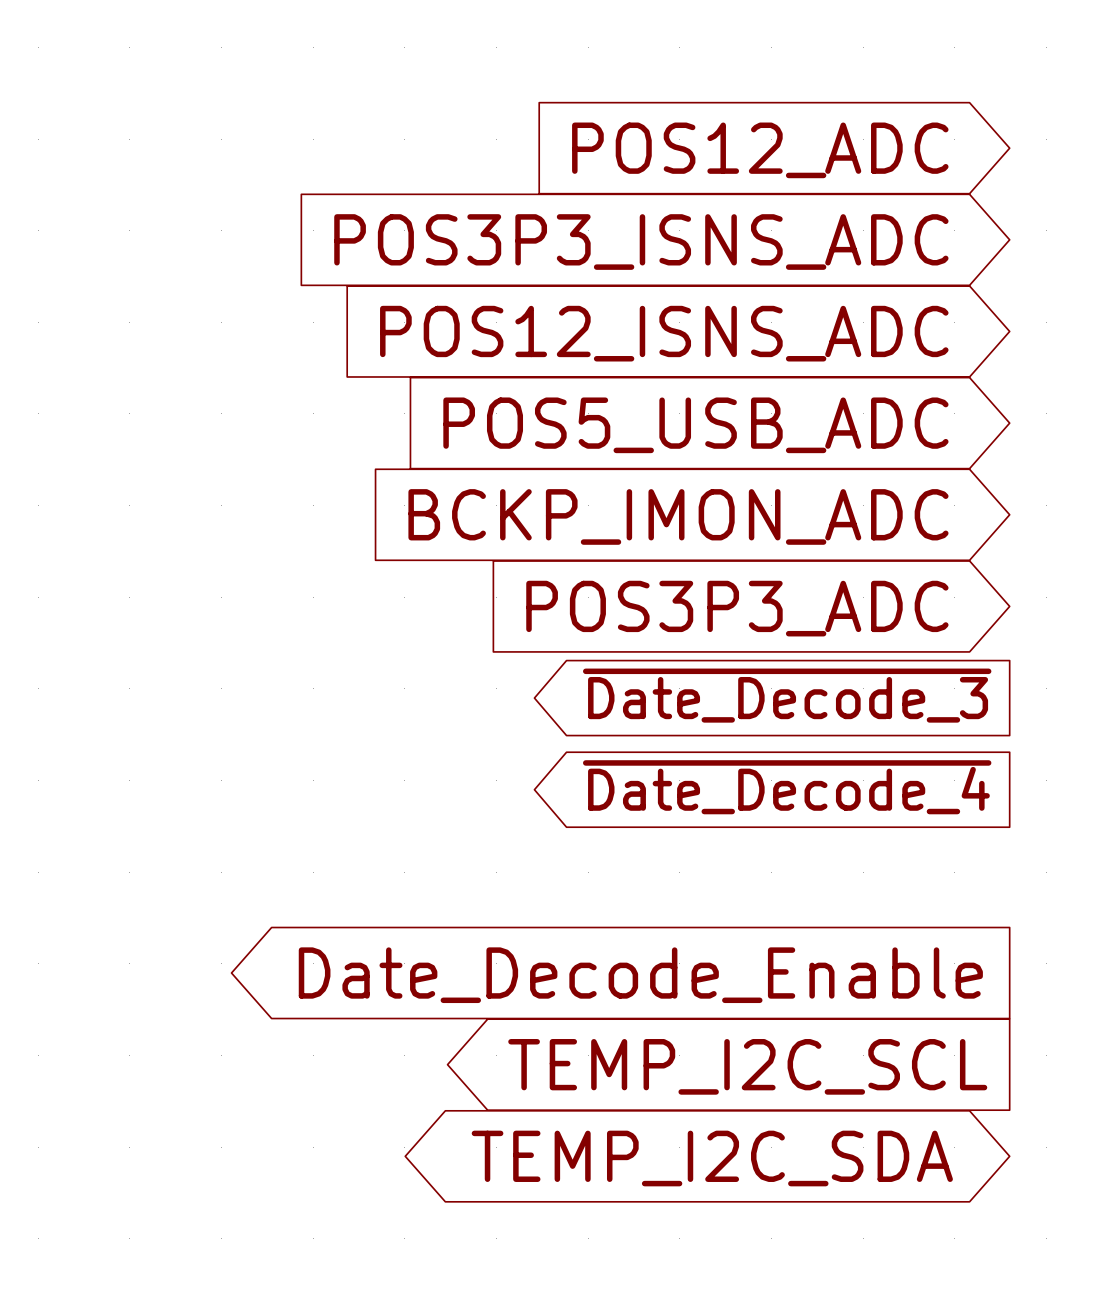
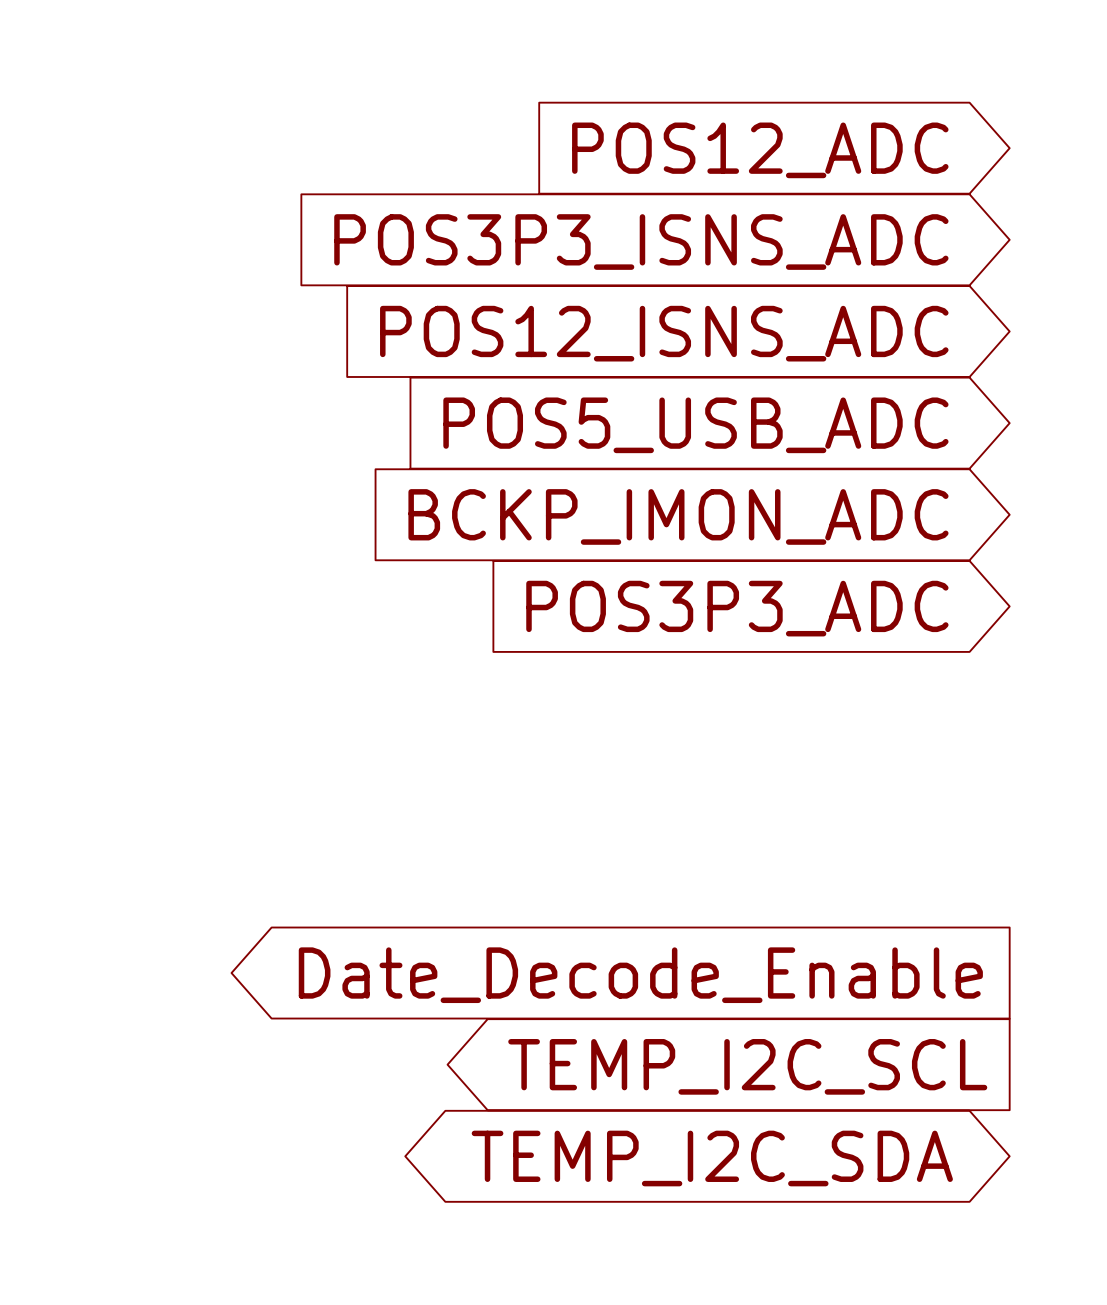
global label: ~{Date_Decode_3} (787, 695) -> none
global label: ~{Date_Decode_4} (787, 787) -> none

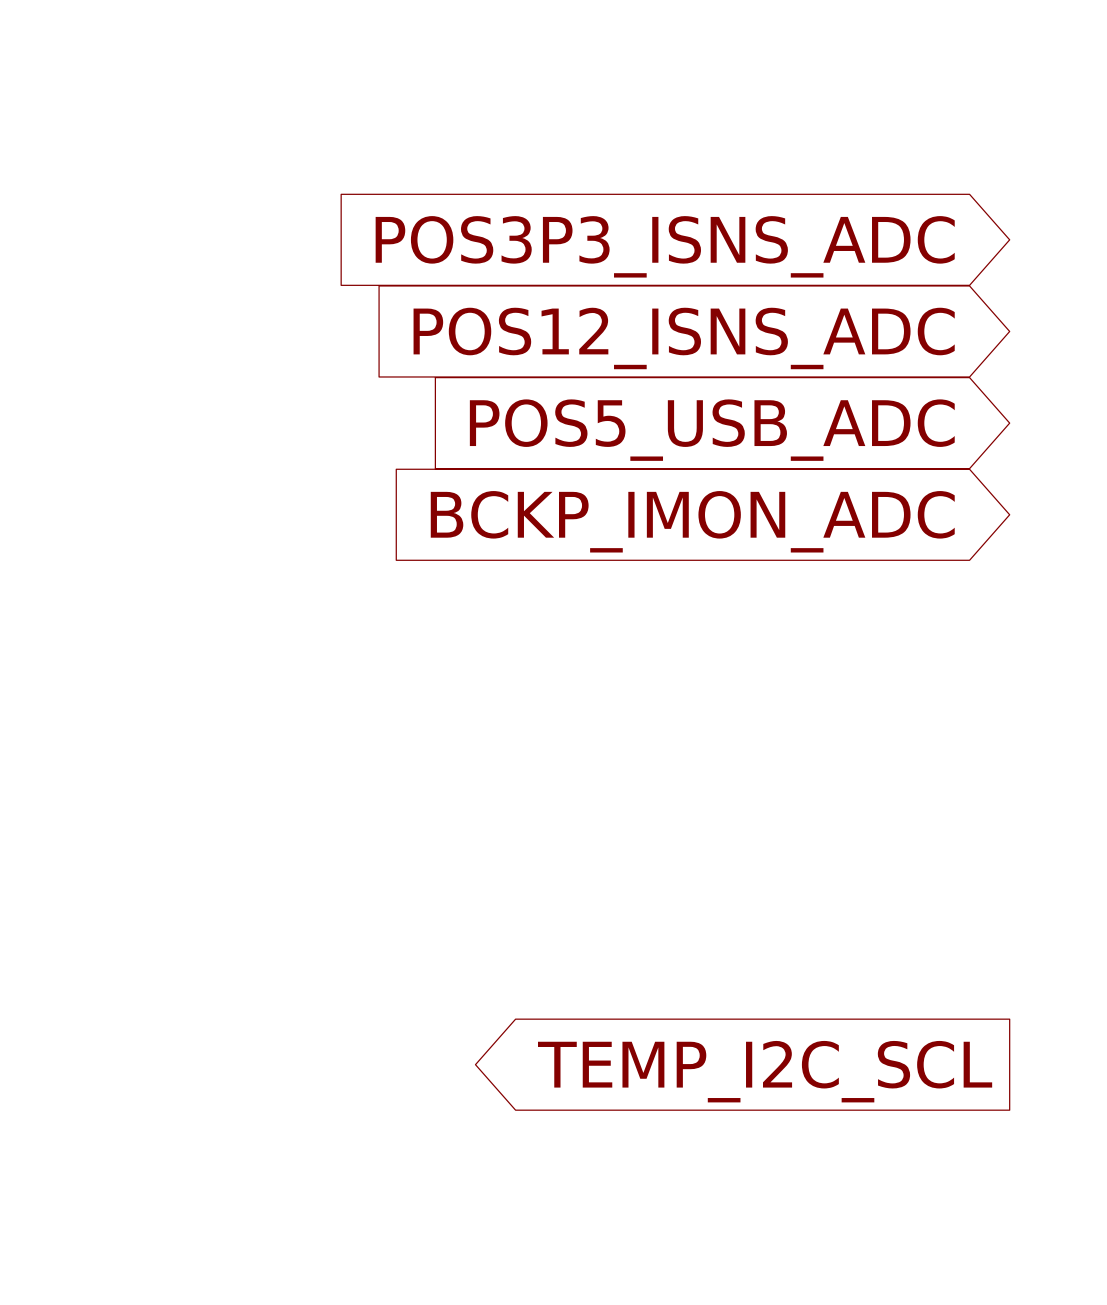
global label: POS12_ADC (760, 150) -> none
global label: POS3P3_ADC (737, 608) -> none
global label: Date_Decode_Enable (640, 975) -> none
global label: TEMP_I2C_SDA (712, 1158) -> none

